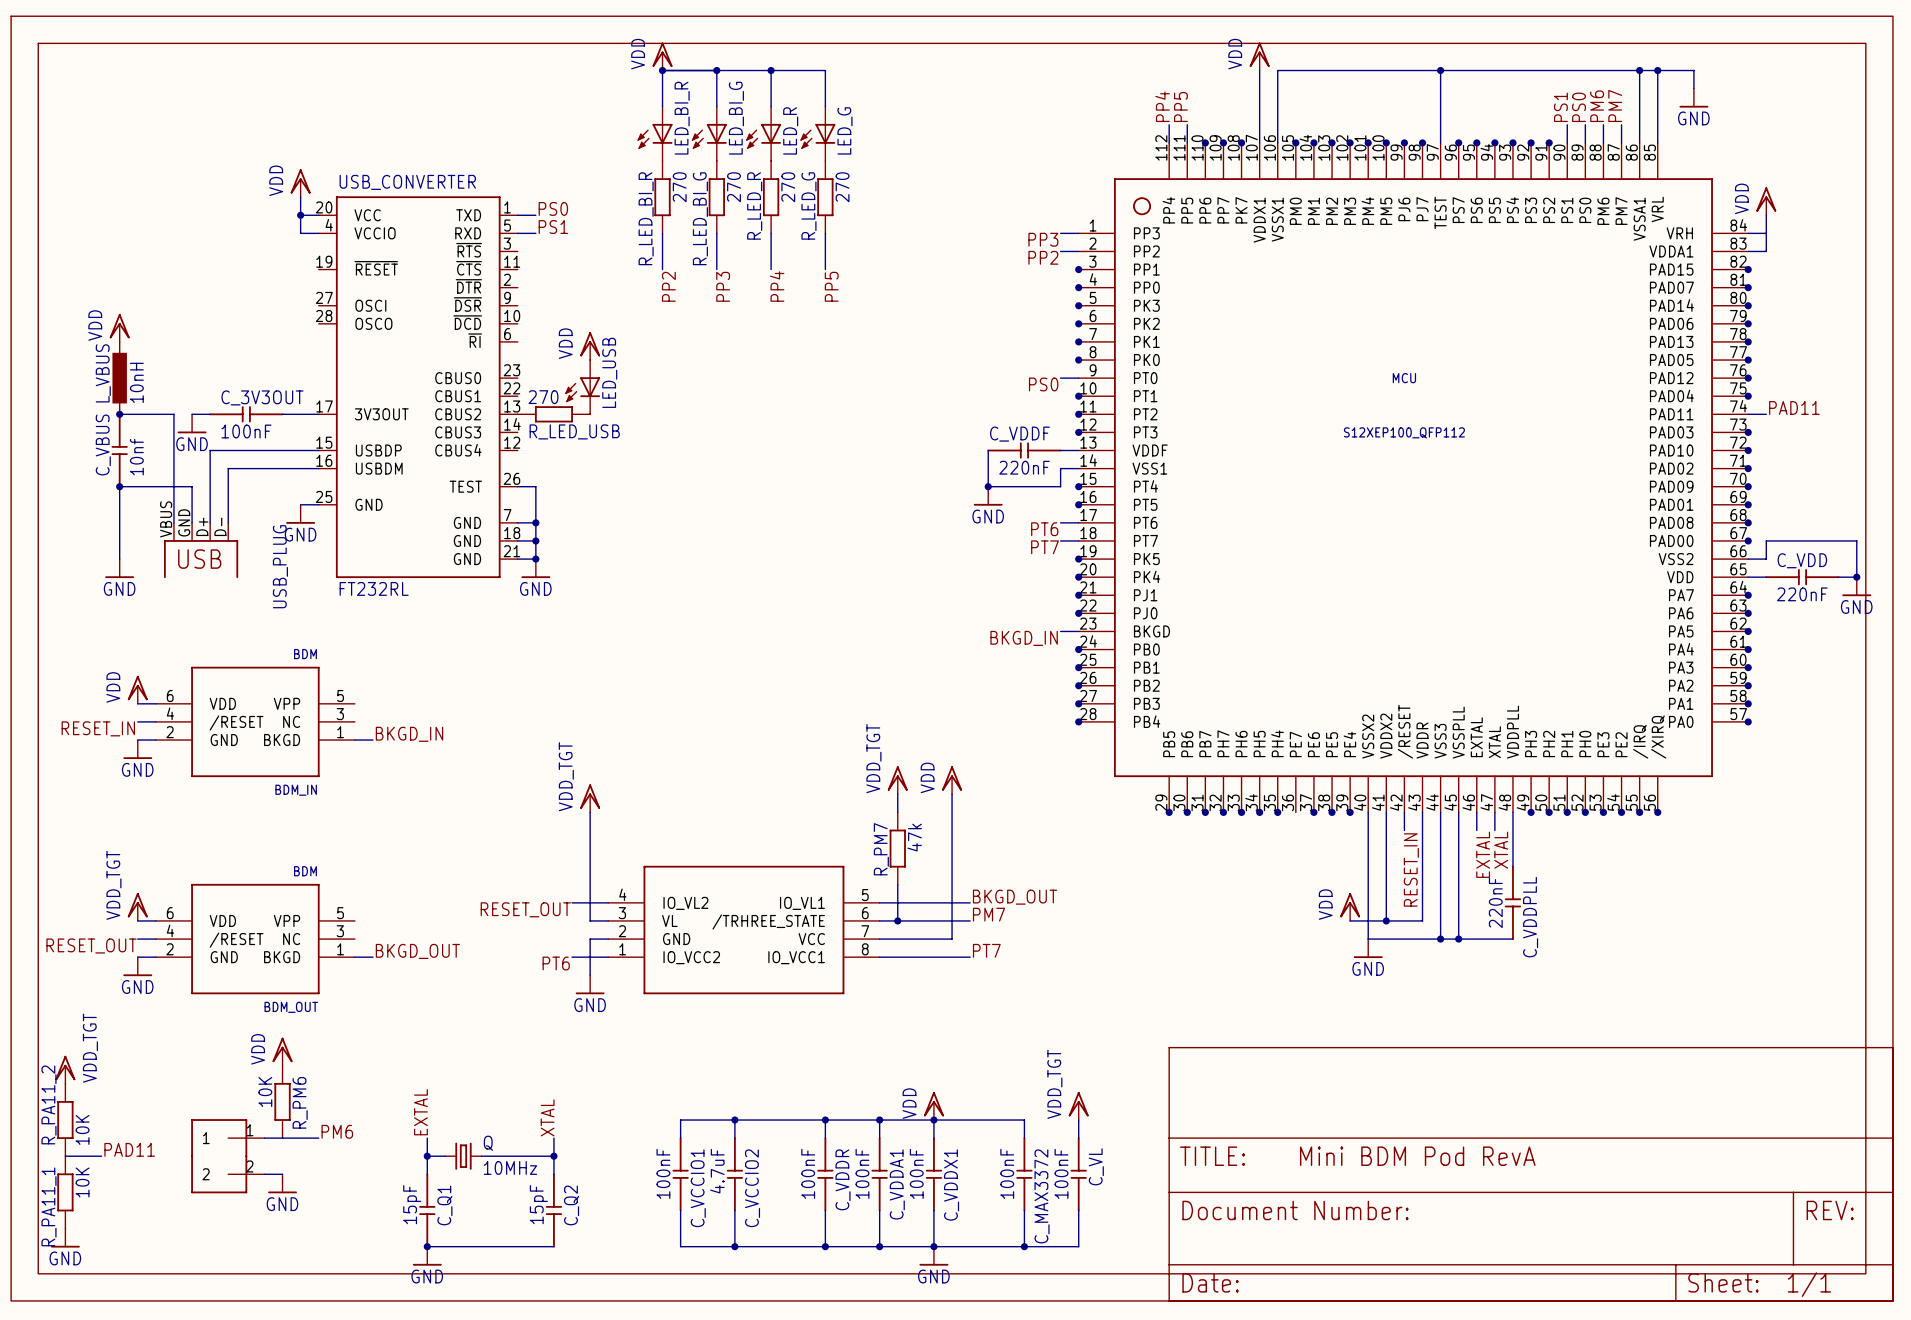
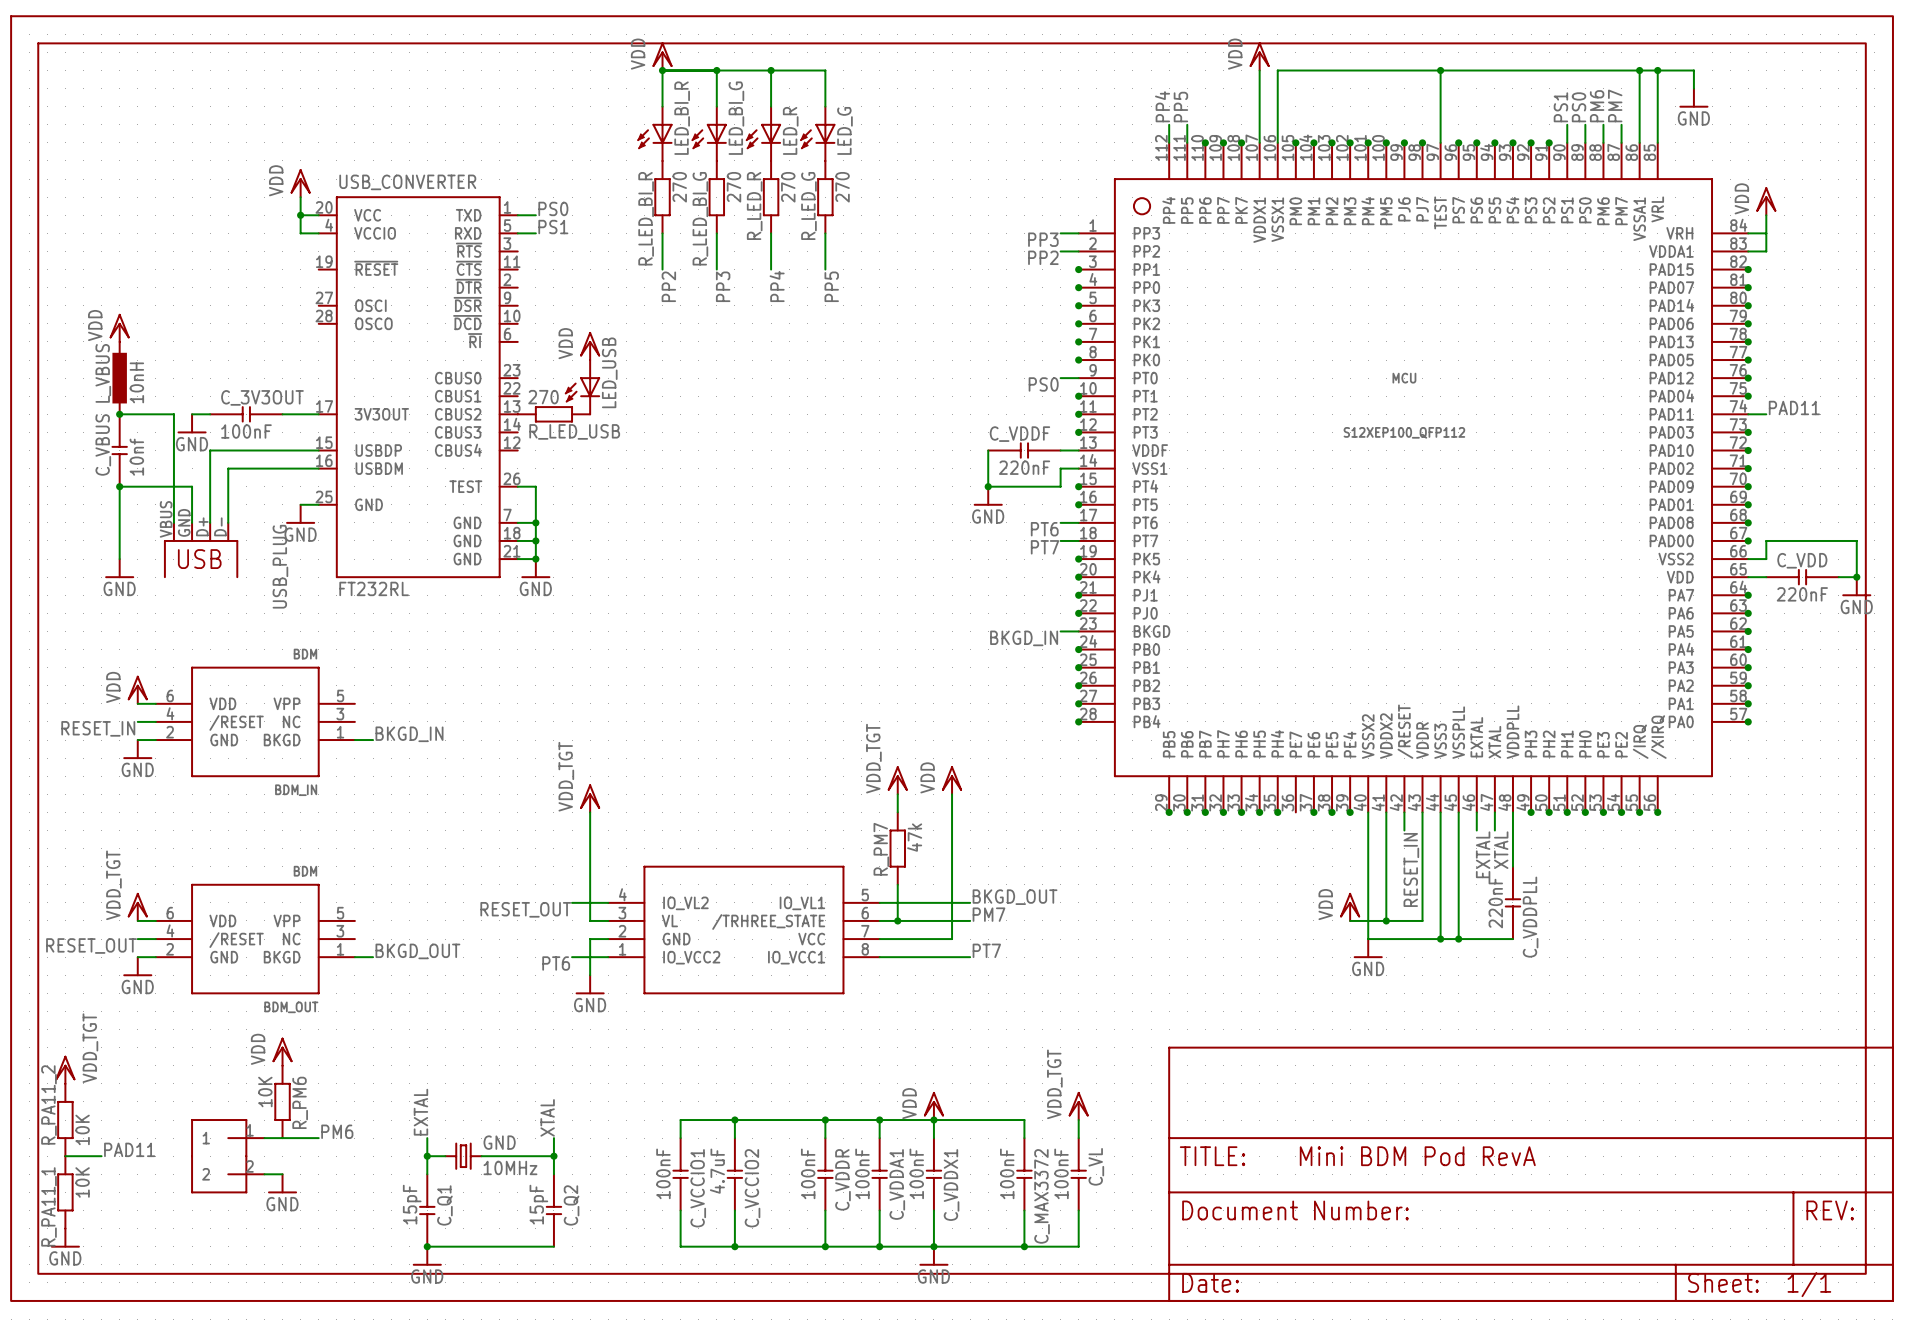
Q name: Q (488, 1143) -> GND (499, 1142)

